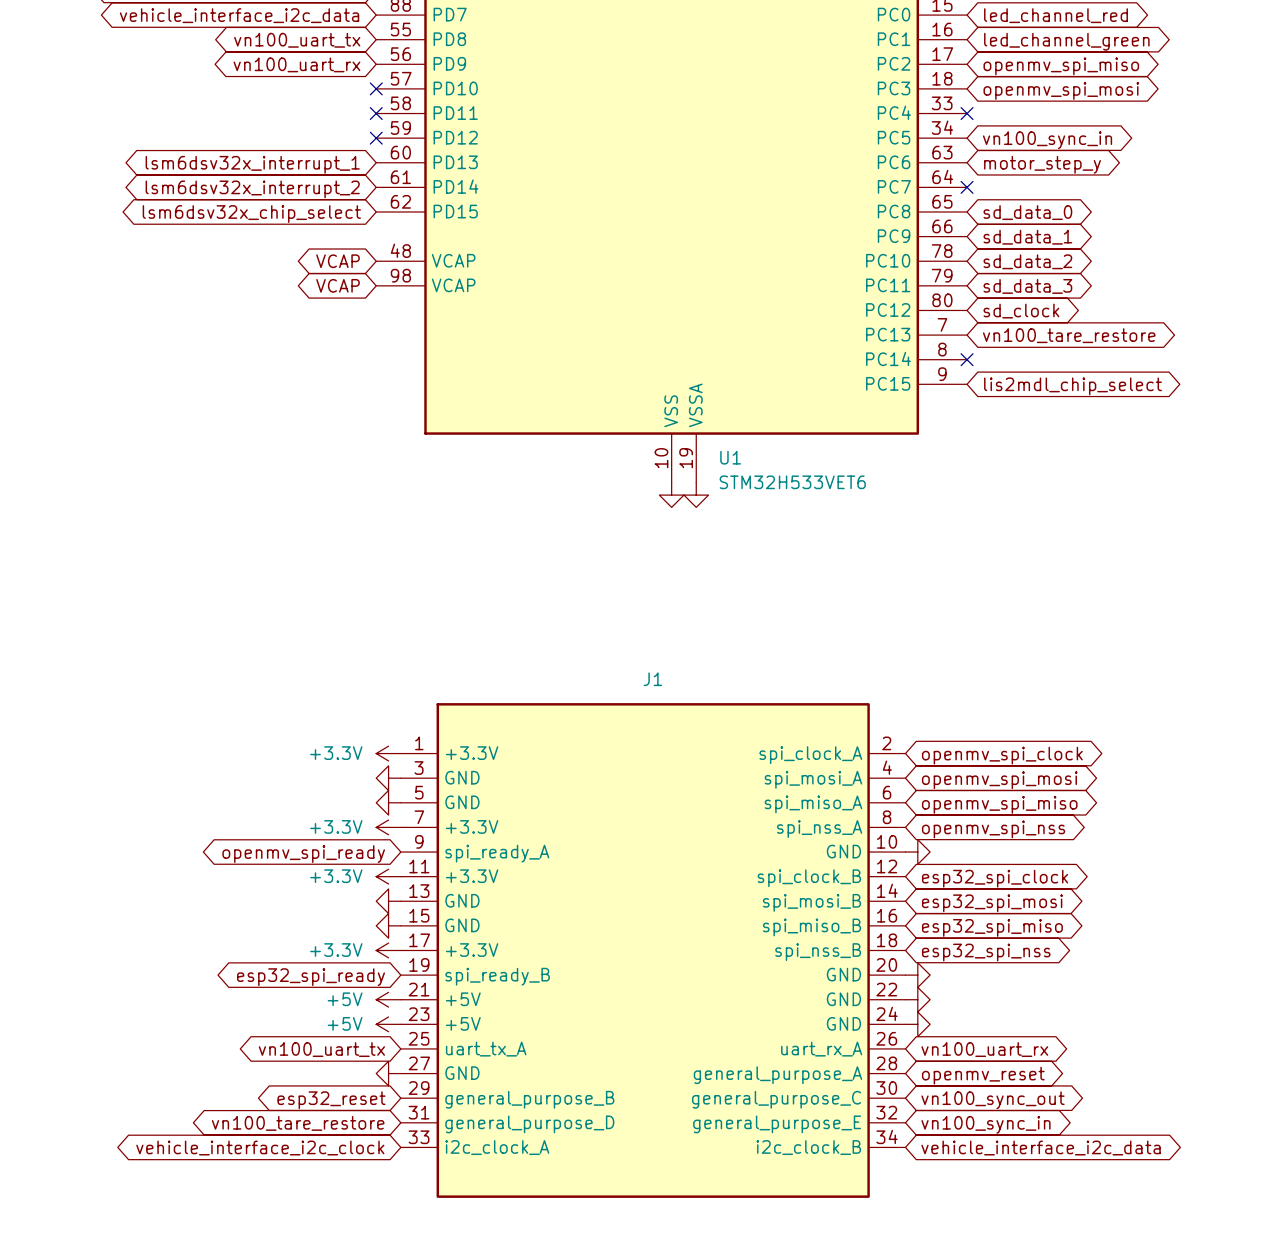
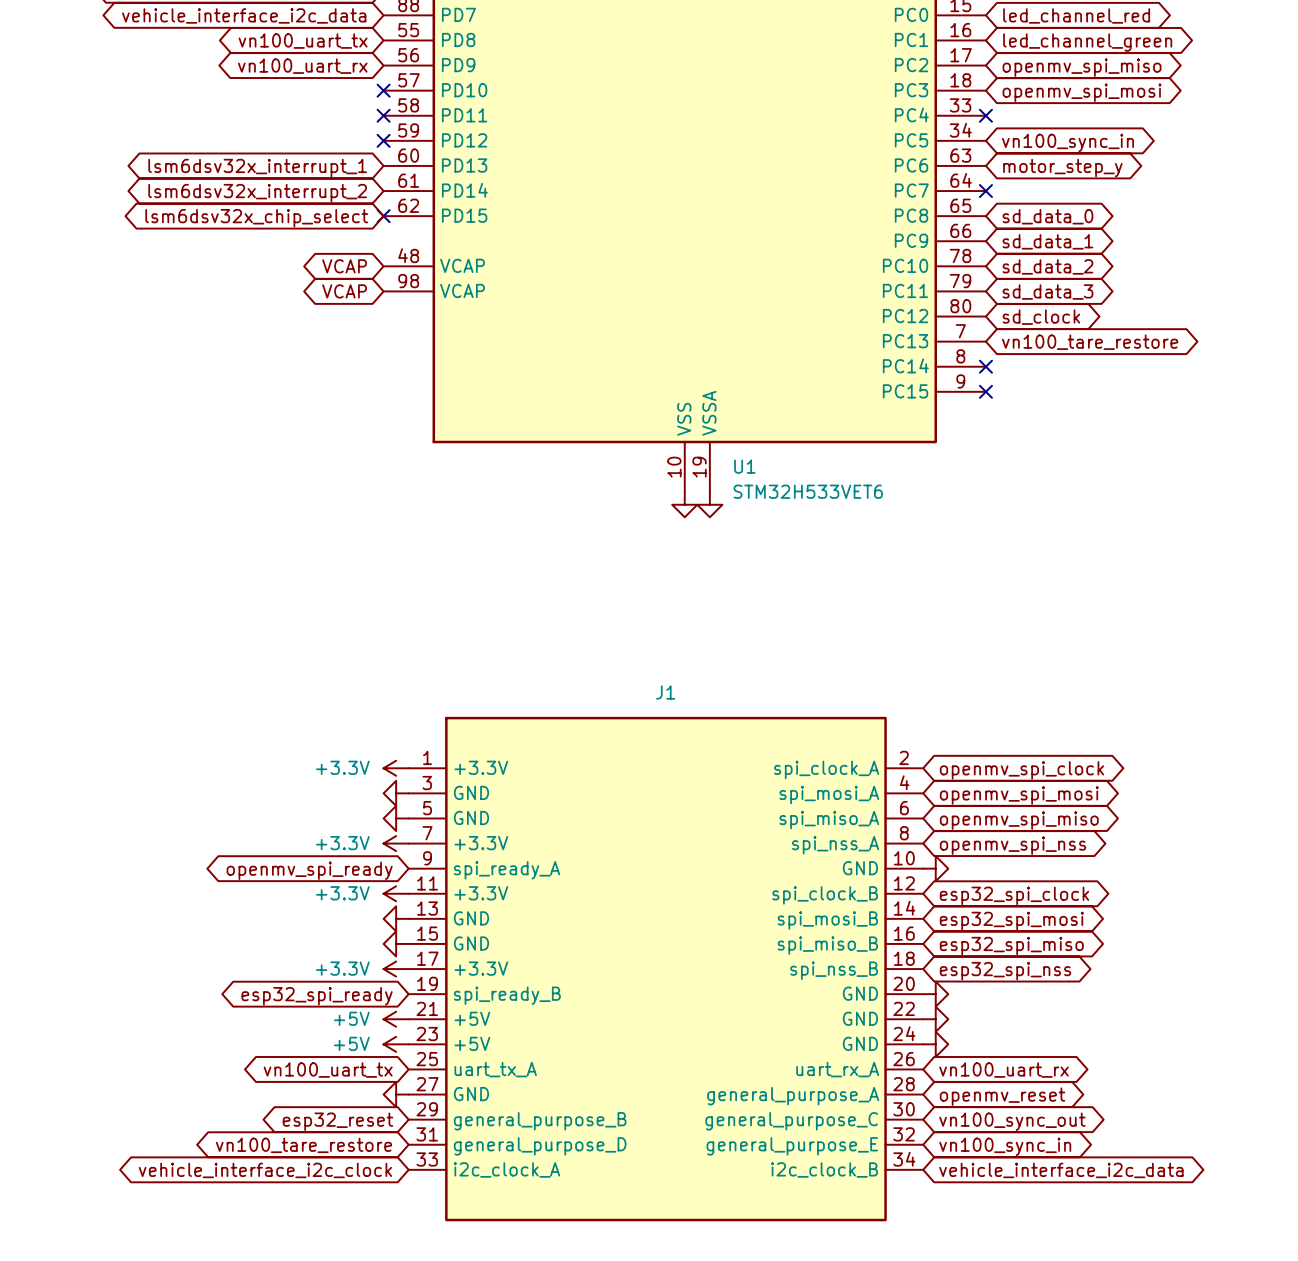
no-connect mark: none -> (383, 216)
no-connect mark: none -> (985, 391)
global label: lis2mdl_chip_select (1073, 386) -> none

